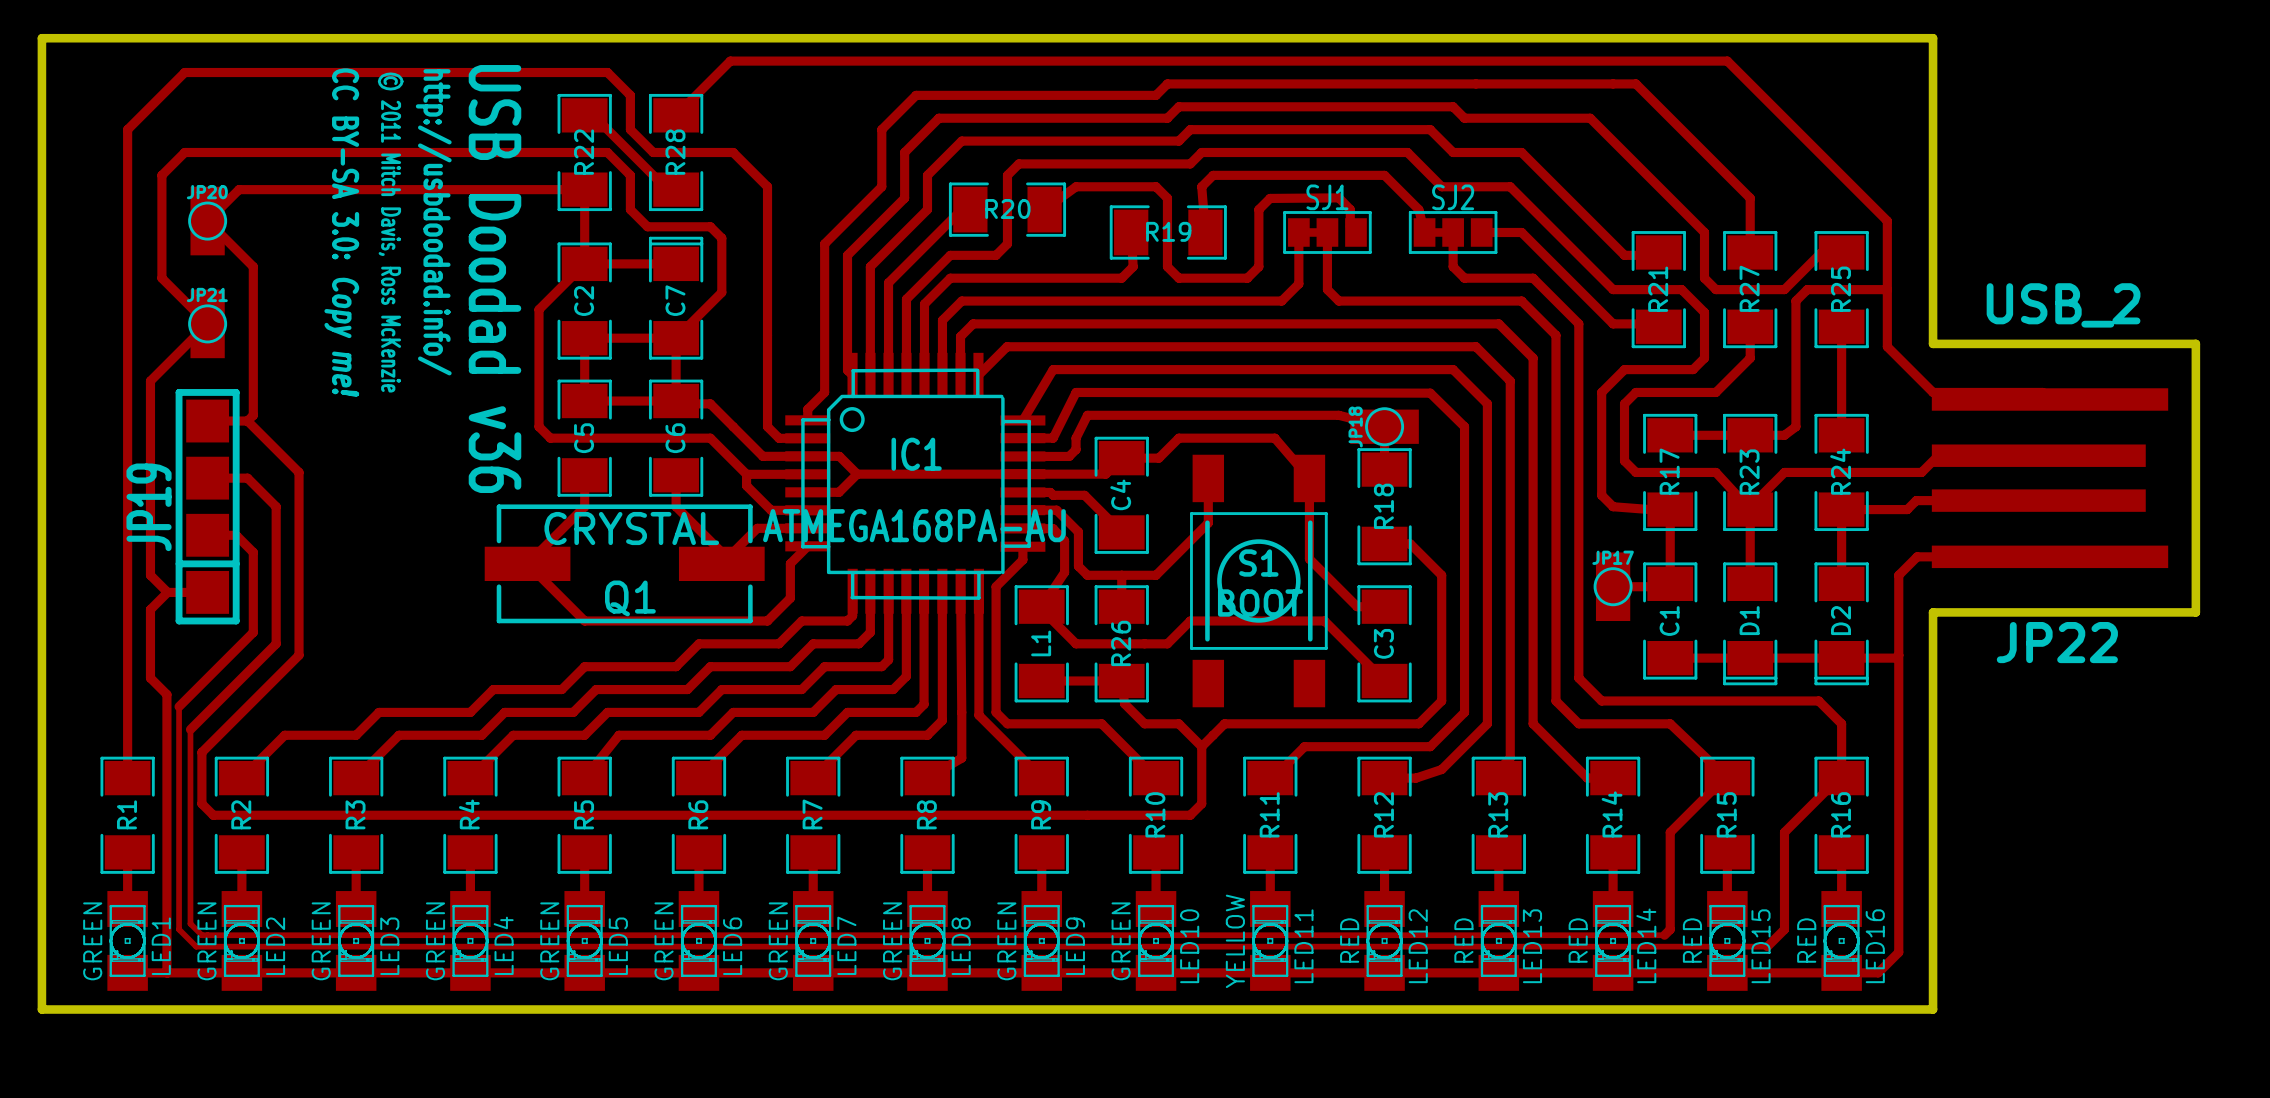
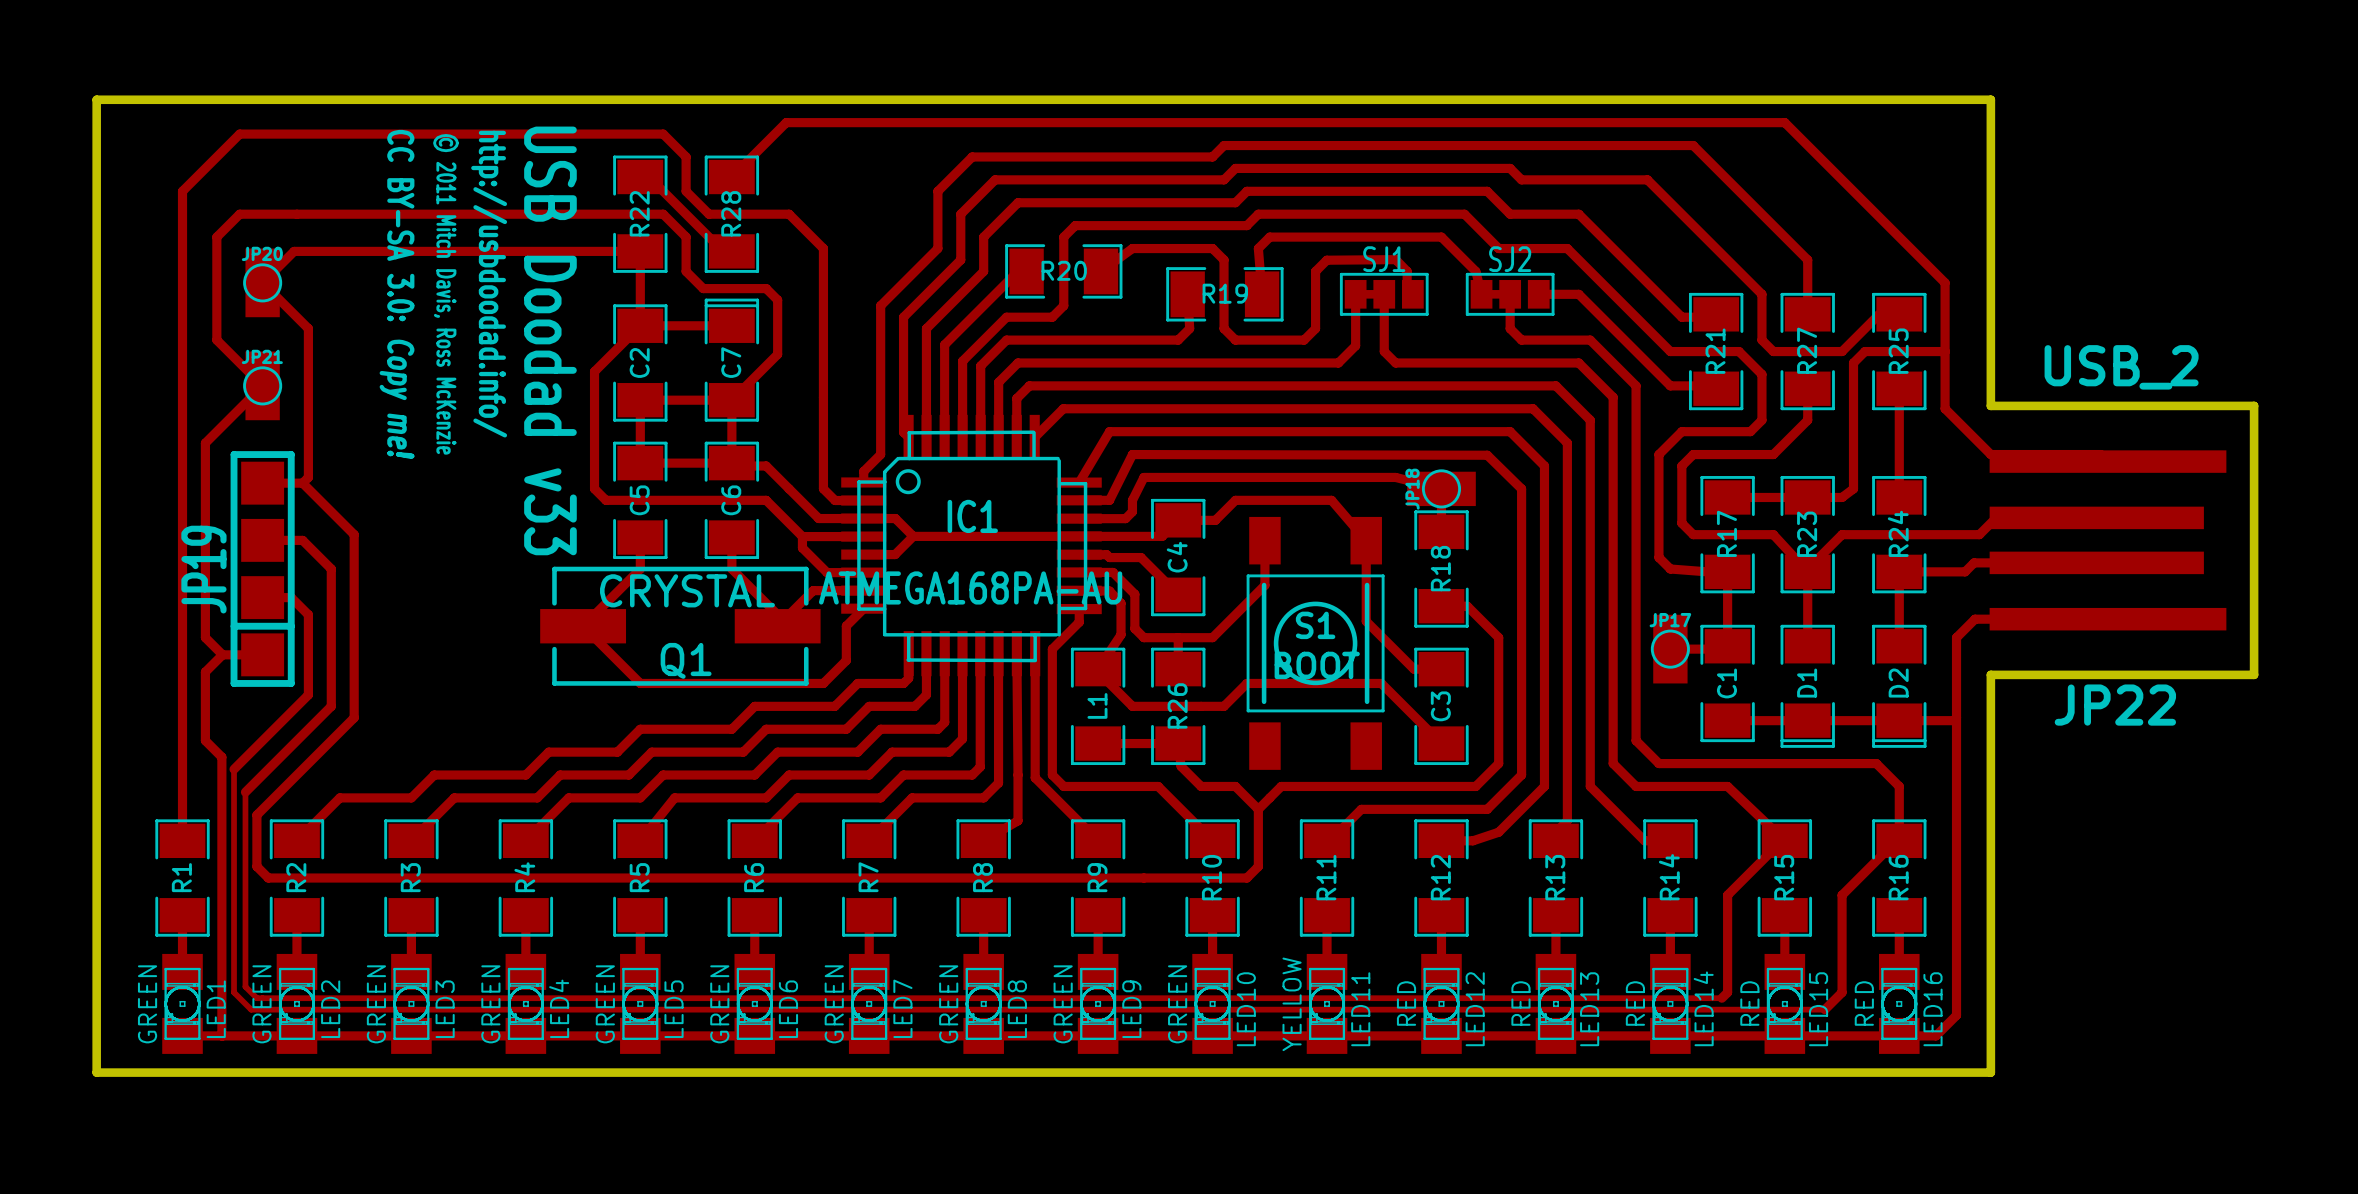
text: USB Doodad v36 (494, 279) -> USB Doodad v33 (550, 340)

